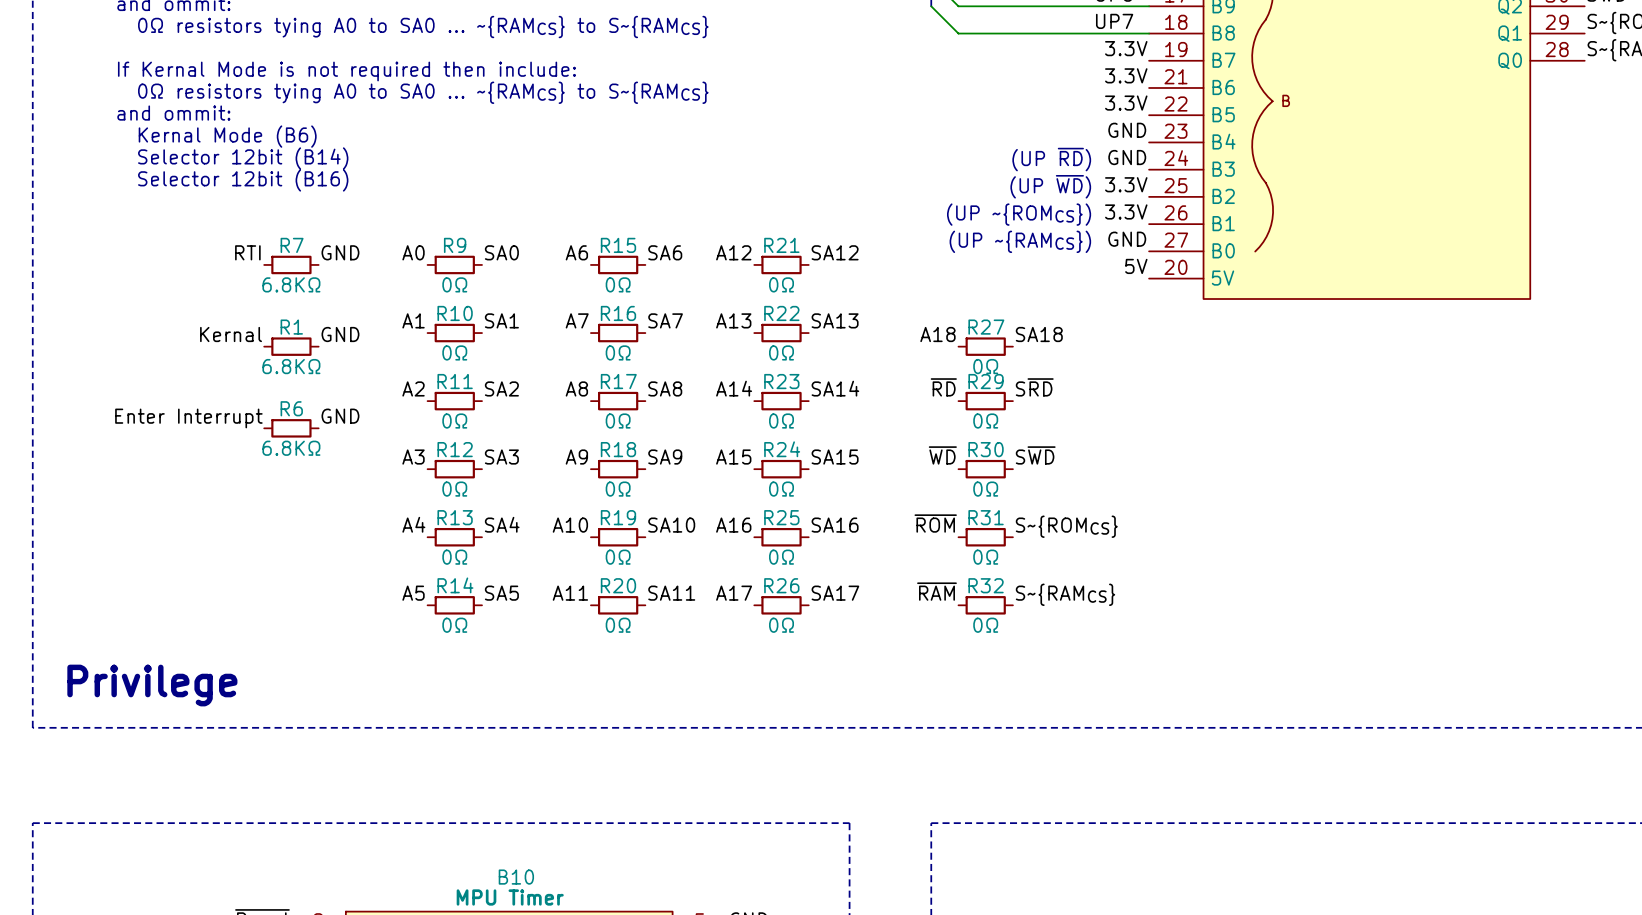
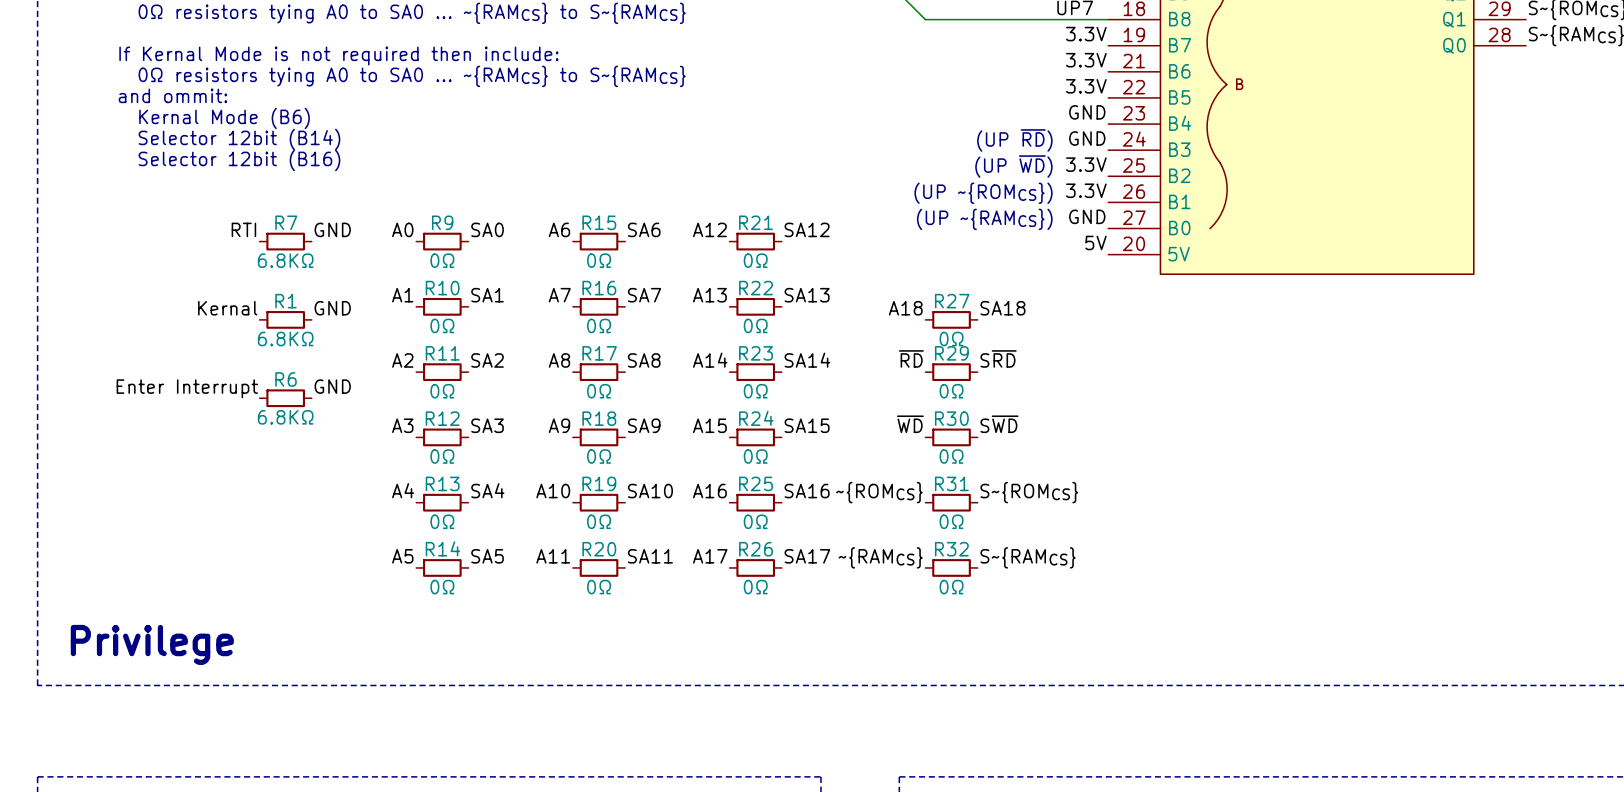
label: ~{ROM} (935, 523) -> ~{ROMCS} (879, 492)
label: ~{RAM} (936, 591) -> ~{RAMCS} (880, 557)

